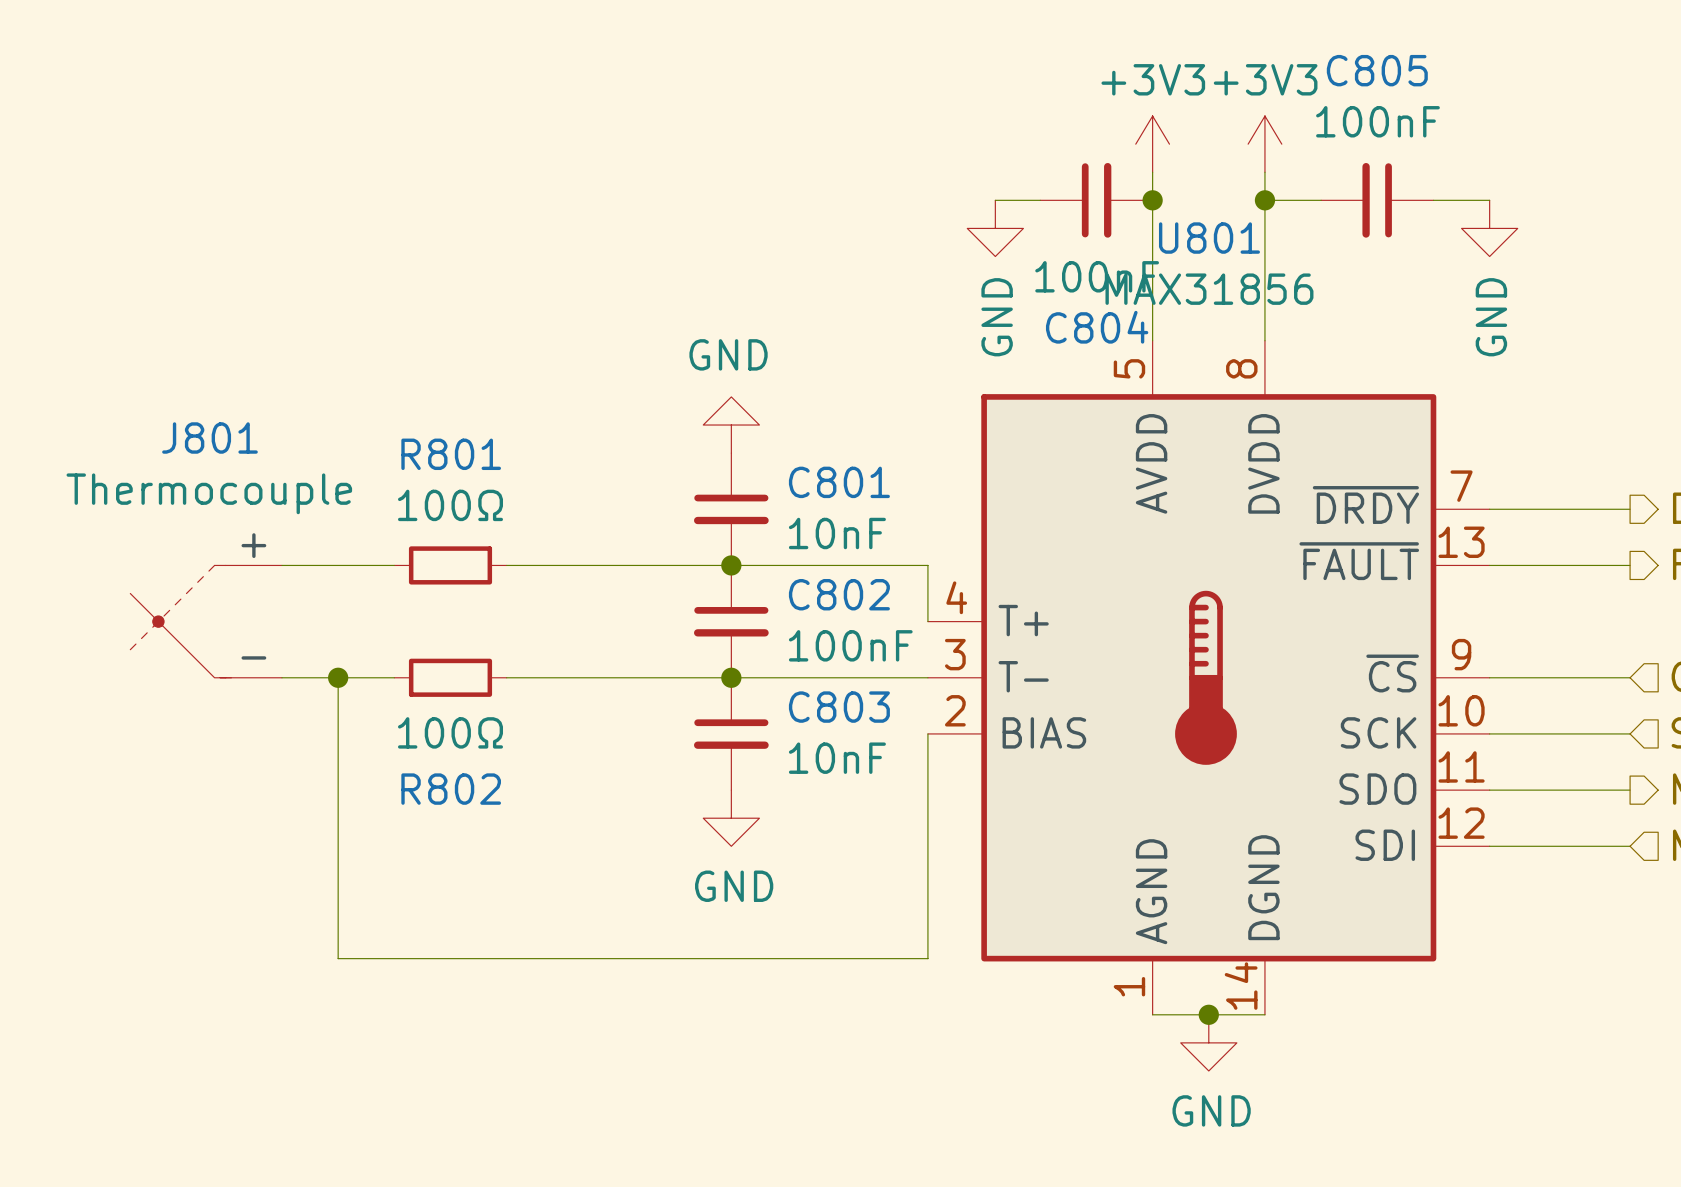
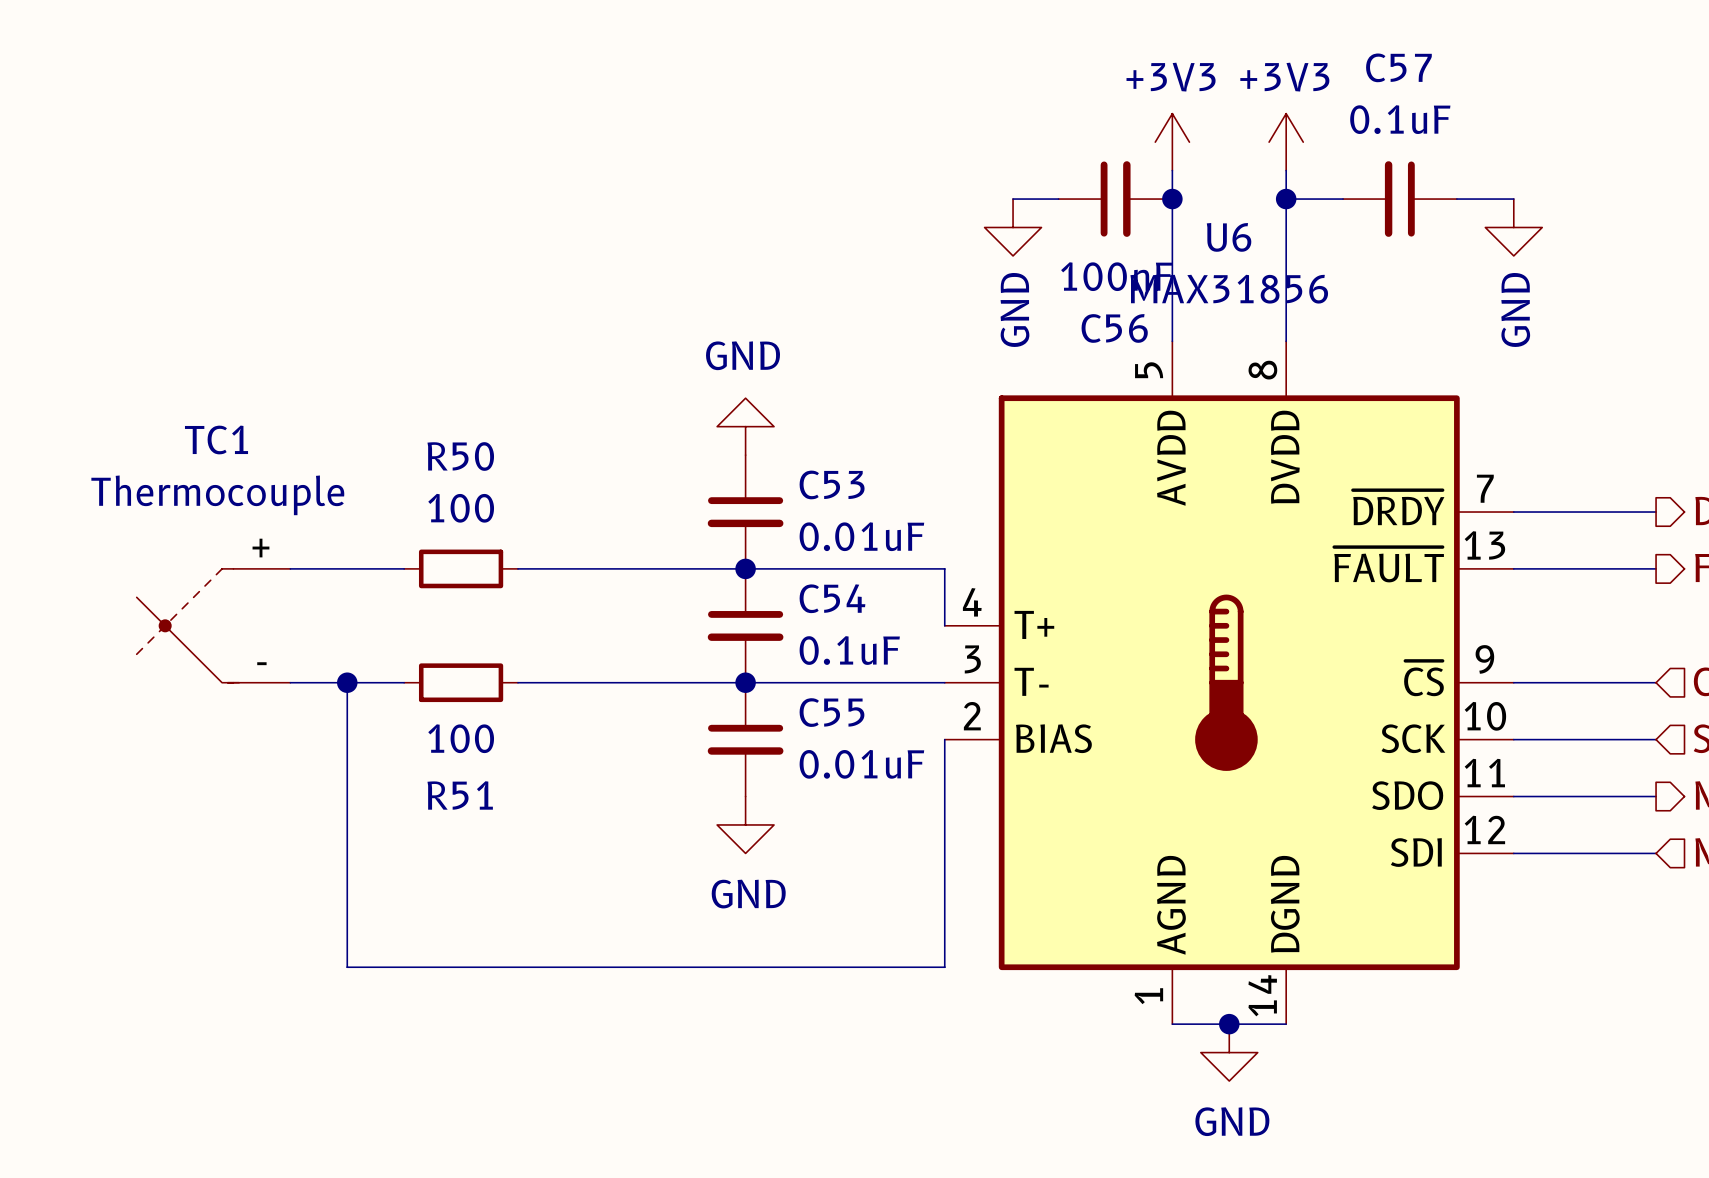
C805 name: C805 (1377, 70) -> C57 (1398, 67)
C805 value: 100nF (1377, 121) -> 0.1uF (1400, 119)
U801 name: U801 (1209, 238) -> U6 (1229, 237)
C804 name: C804 (1097, 327) -> C56 (1114, 328)
J801 name: J801 (209, 438) -> TC1 (216, 439)
R801 name: R801 (451, 454) -> R50 (460, 456)
C801 name: C801 (839, 482) -> C53 (832, 484)
R801 value: 100Ω (450, 505) -> 100 (461, 508)
C801 value: 10nF (837, 533) -> 0.01uF (861, 536)
C802 name: C802 (839, 594) -> C54 (832, 598)
C802 value: 100nF (850, 645) -> 0.1uF (849, 650)
C803 name: C803 (839, 707) -> C55 (831, 712)
R802 value: 100Ω (450, 732) -> 100 (461, 738)
C803 value: 10nF (837, 758) -> 0.01uF (861, 764)
R802 name: R802 (451, 789) -> R51 (460, 795)

